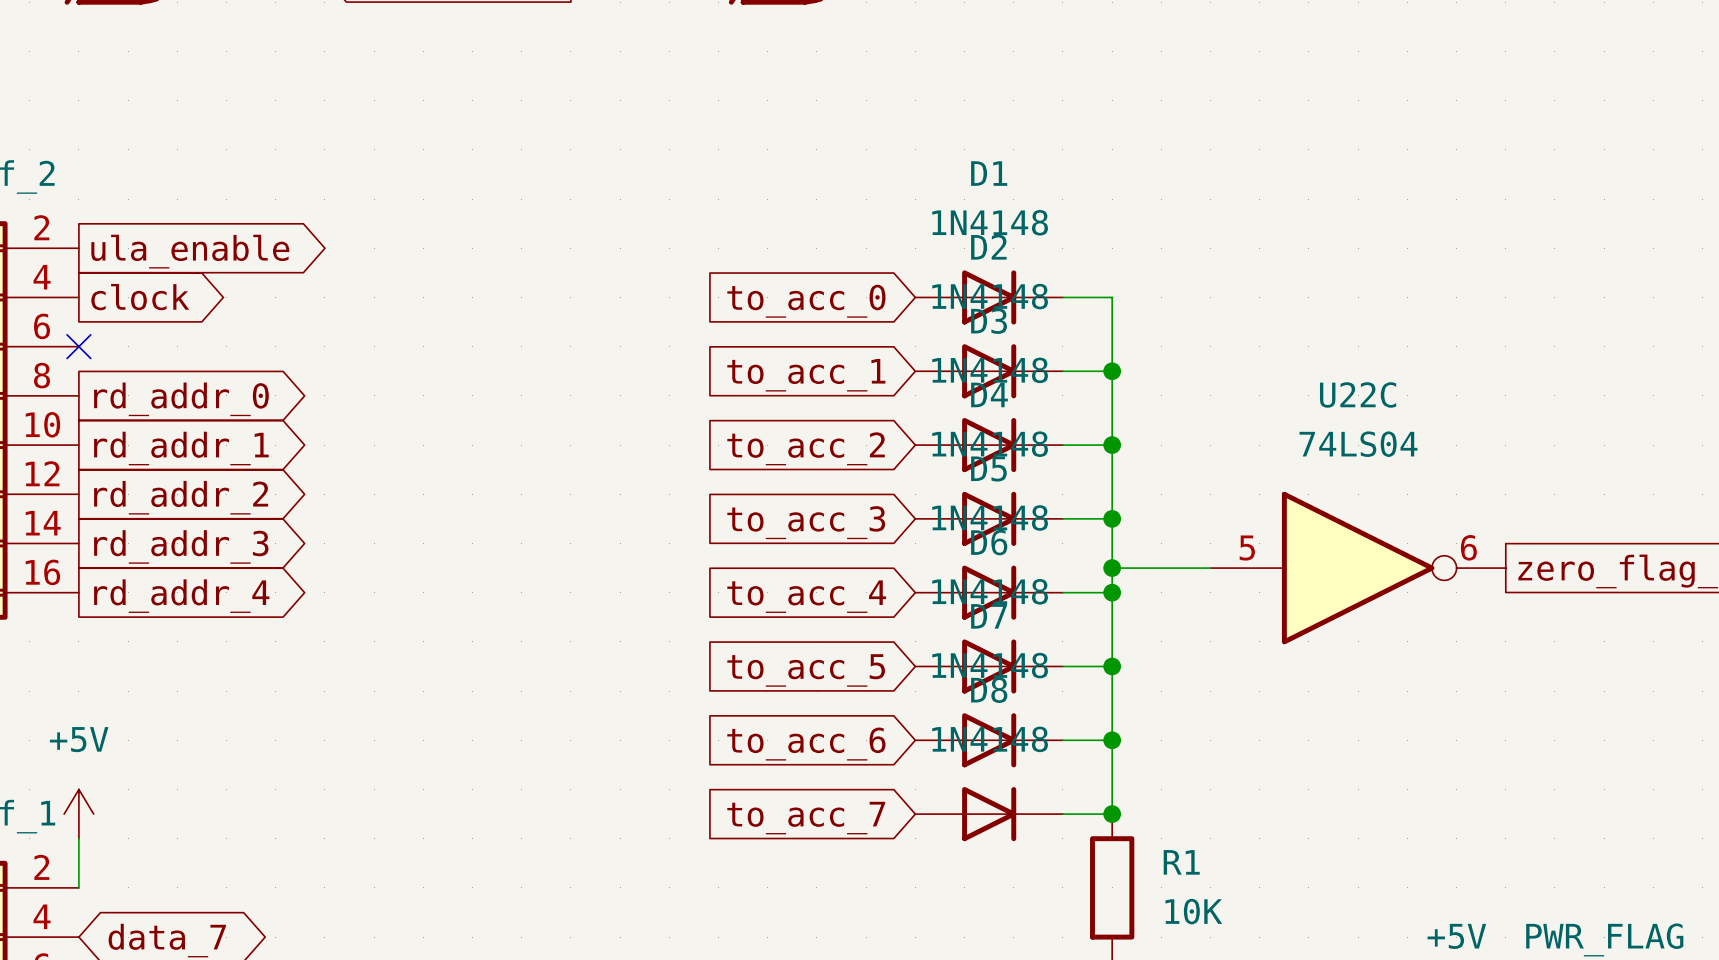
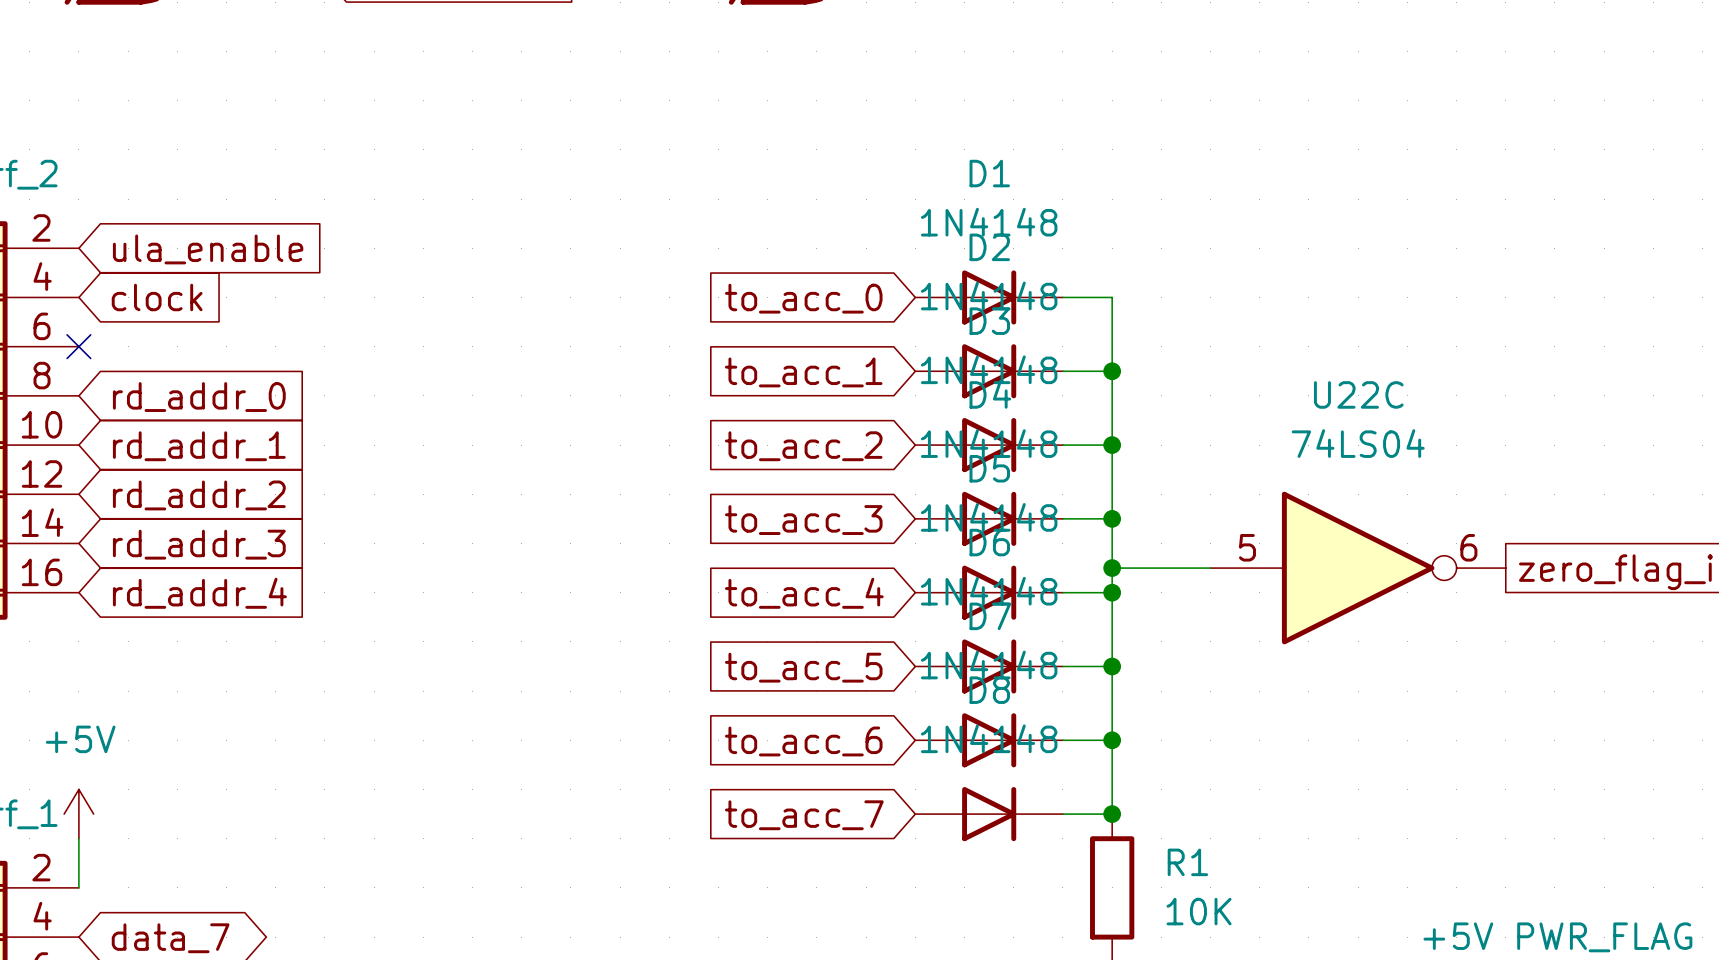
global label shape: output (190, 251) -> input (208, 249)
global label shape: output (140, 297) -> input (157, 297)
global label shape: output (181, 399) -> input (199, 397)
global label shape: output (181, 448) -> input (199, 446)
global label shape: output (181, 497) -> input (199, 495)
global label shape: output (181, 546) -> input (199, 544)
global label shape: output (181, 596) -> input (199, 593)

